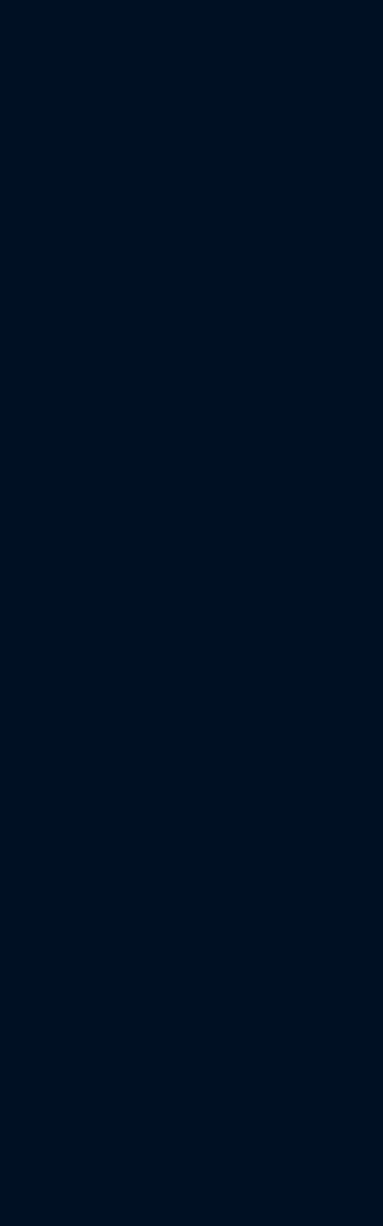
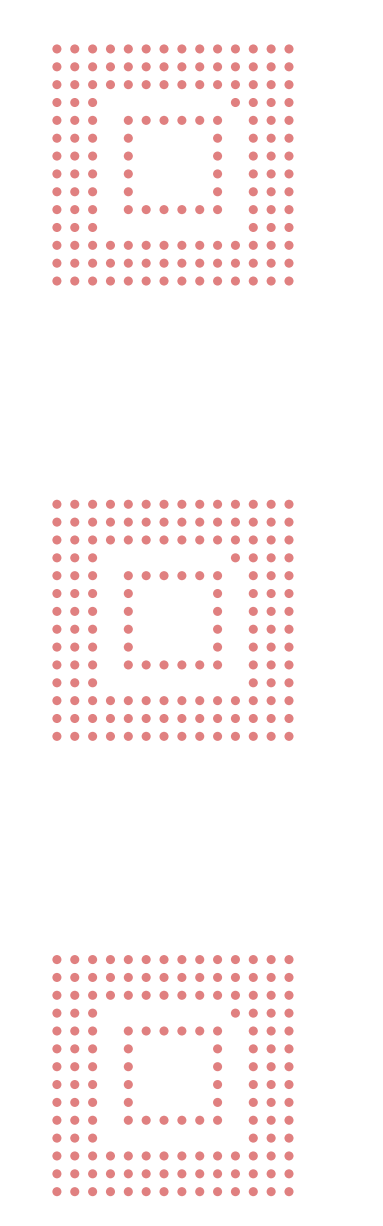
part: none -> (172, 164)
part: none -> (172, 620)
part: none -> (172, 1075)

